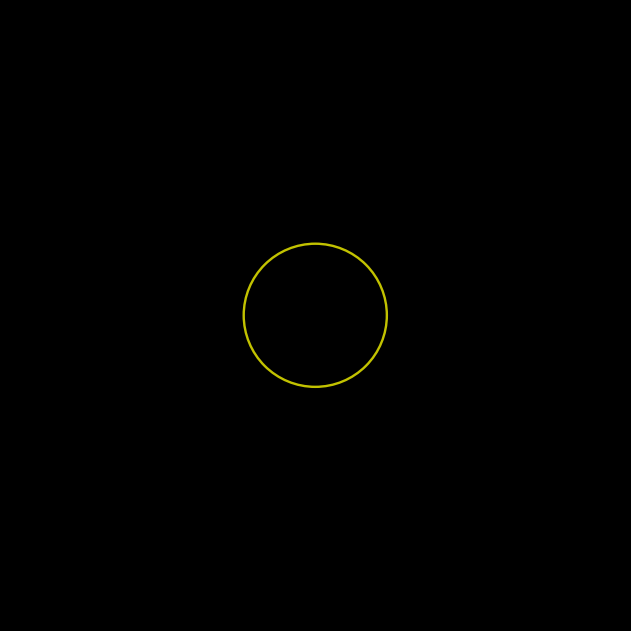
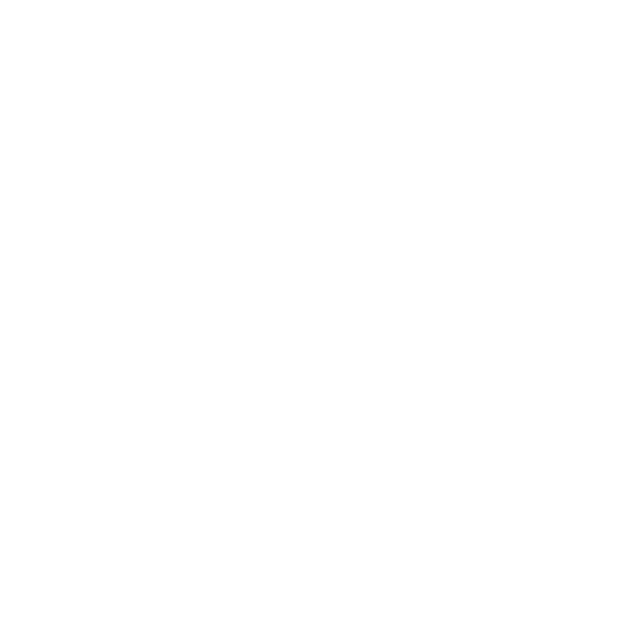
round board edge: [242, 242, 389, 389] -> none

